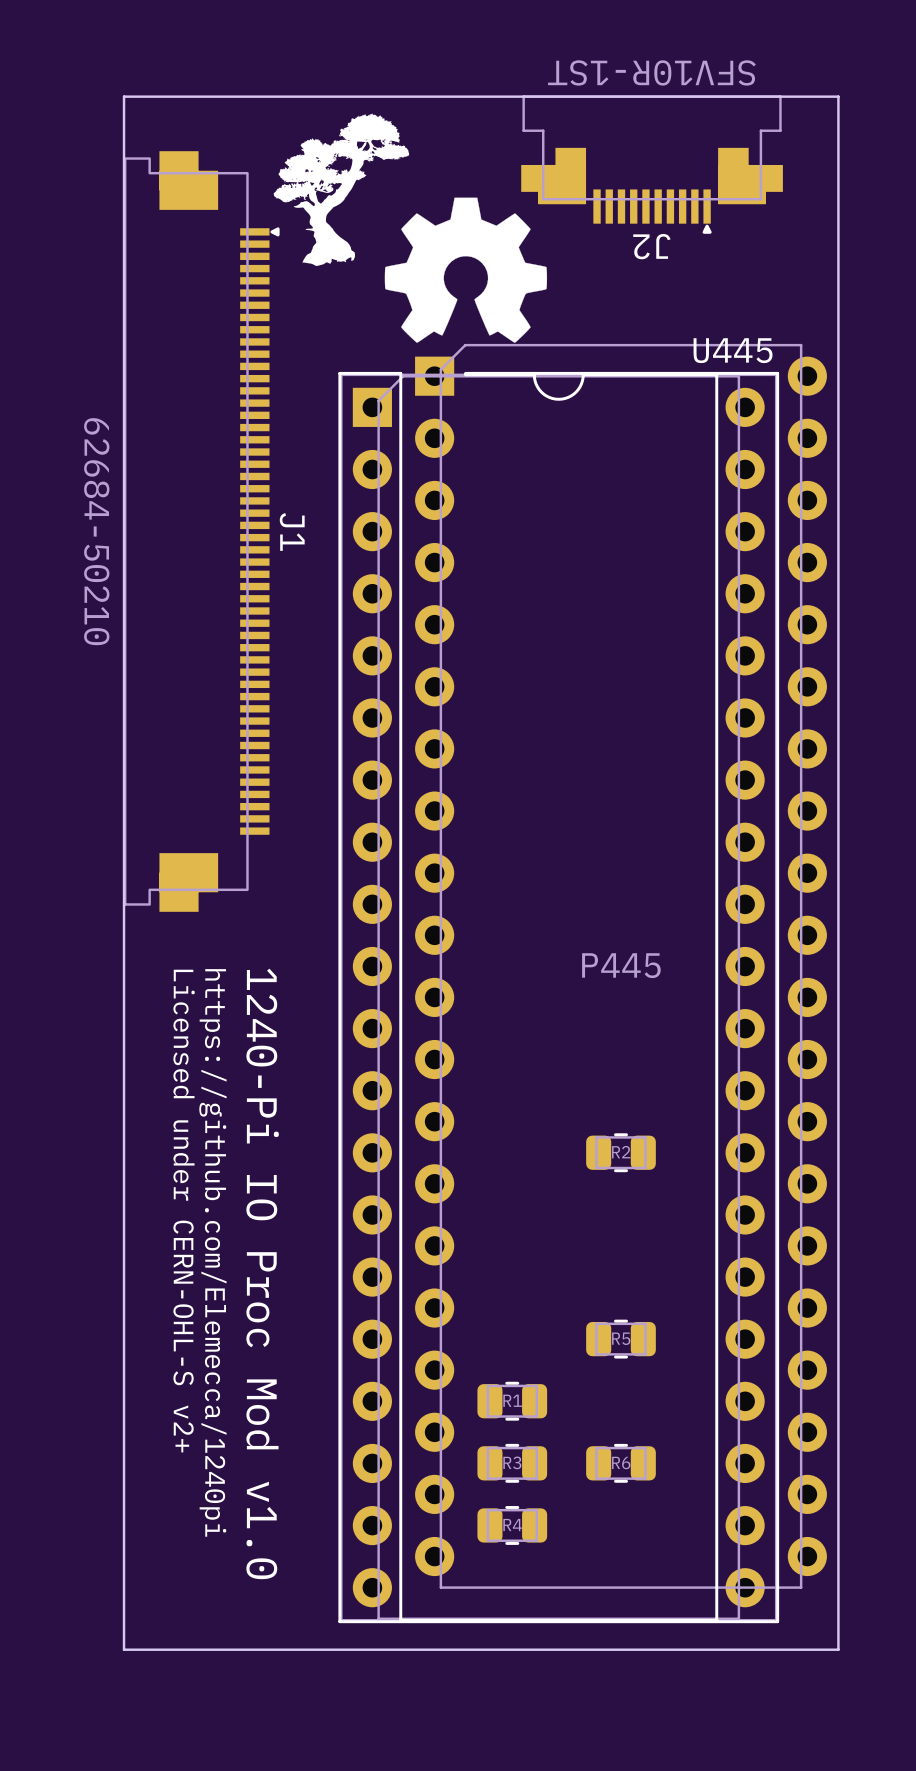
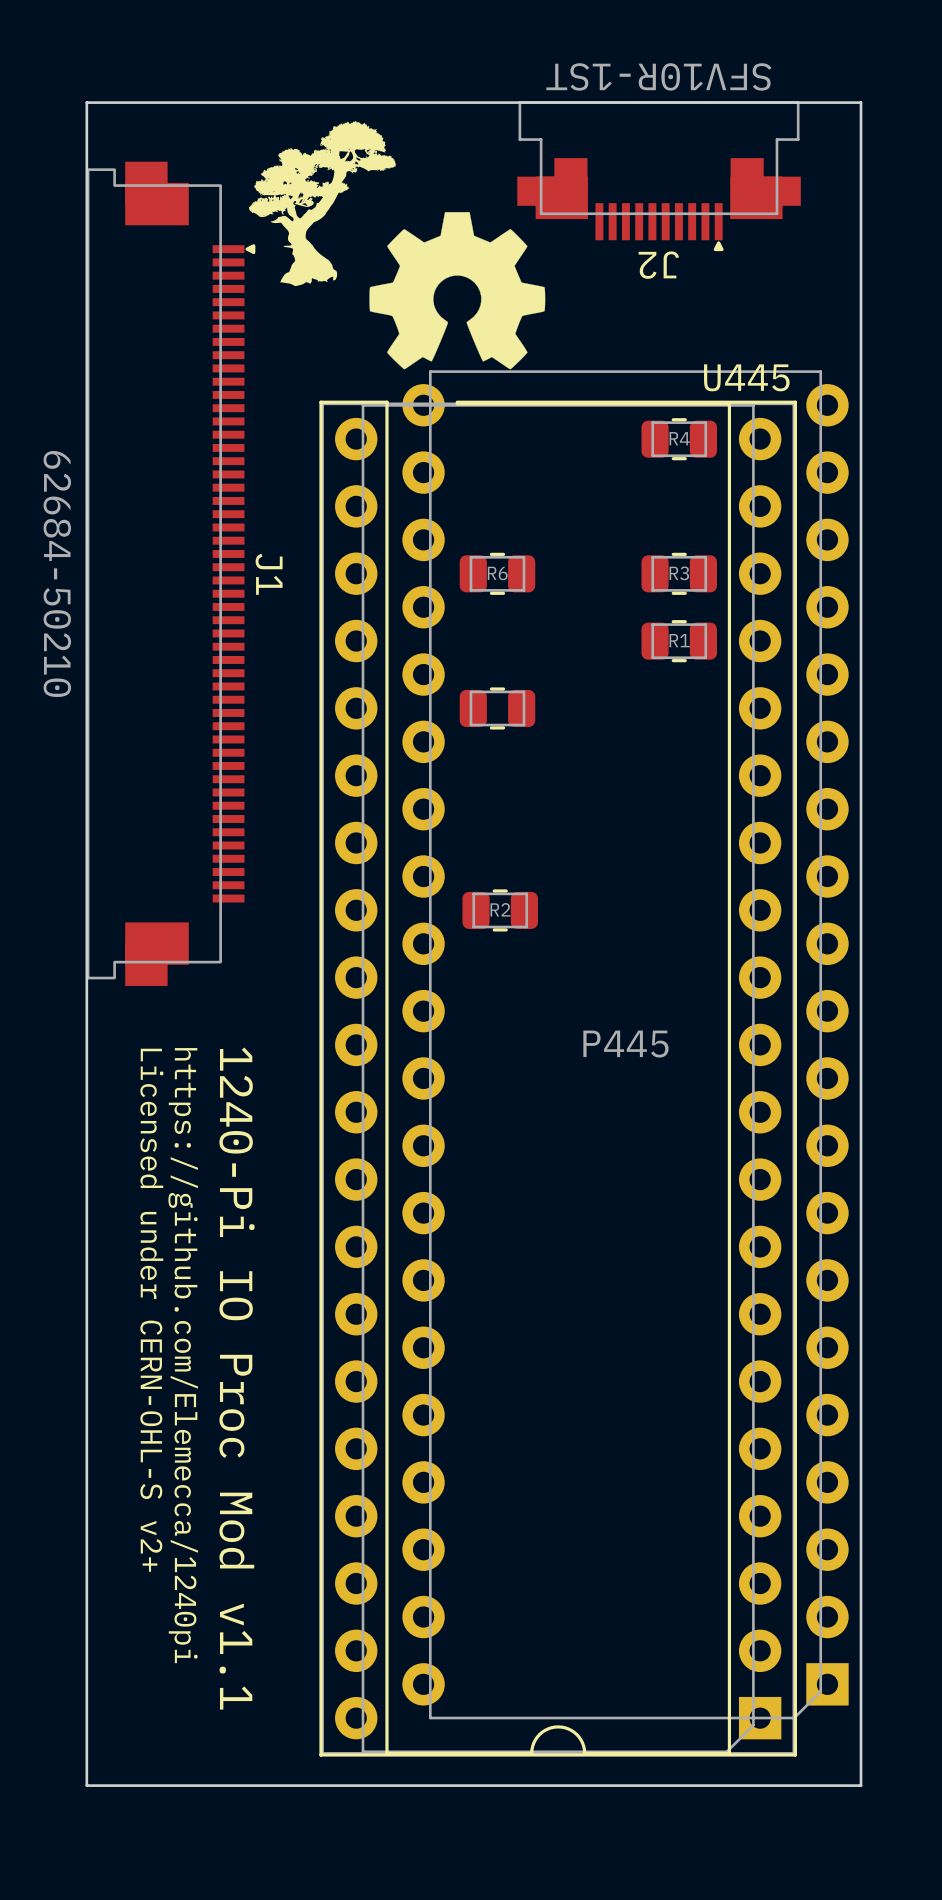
U445 footprint: [338, 371, 780, 1624] -> [319, 400, 797, 1757]
part: none -> (497, 708)
P445 rotation: 0° (621, 966) -> 180° (625, 1044)
R2 position: (621, 1152) -> (500, 910)
text: 1240-Pi IO Proc Mod v1.0 (262, 1273) -> 1240-Pi IO Proc Mod v1.1 (237, 1378)
R5: (621, 1339) -> none
R1 position: (512, 1401) -> (679, 641)
R3 position: (512, 1463) -> (679, 573)
R6 position: (621, 1463) -> (497, 573)
R4 position: (512, 1525) -> (679, 439)

